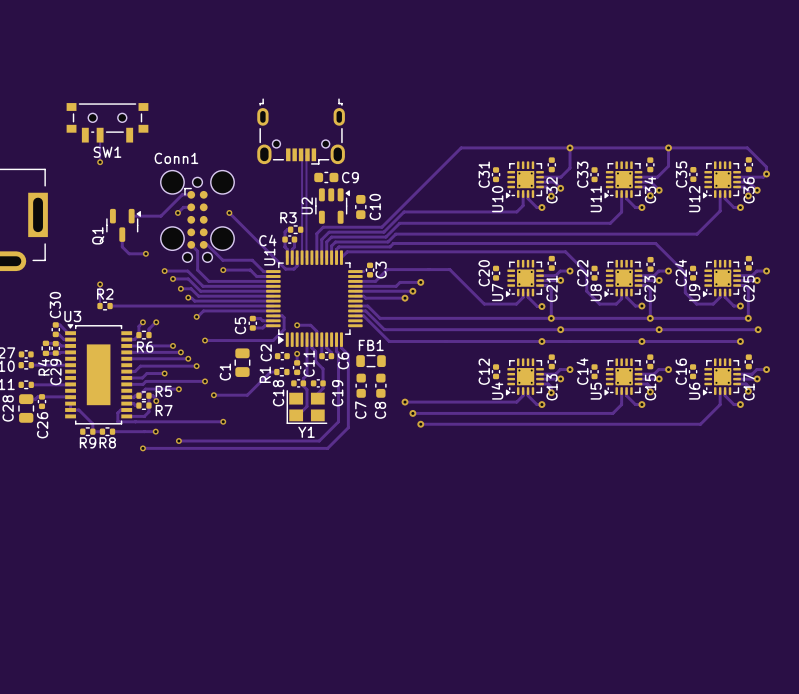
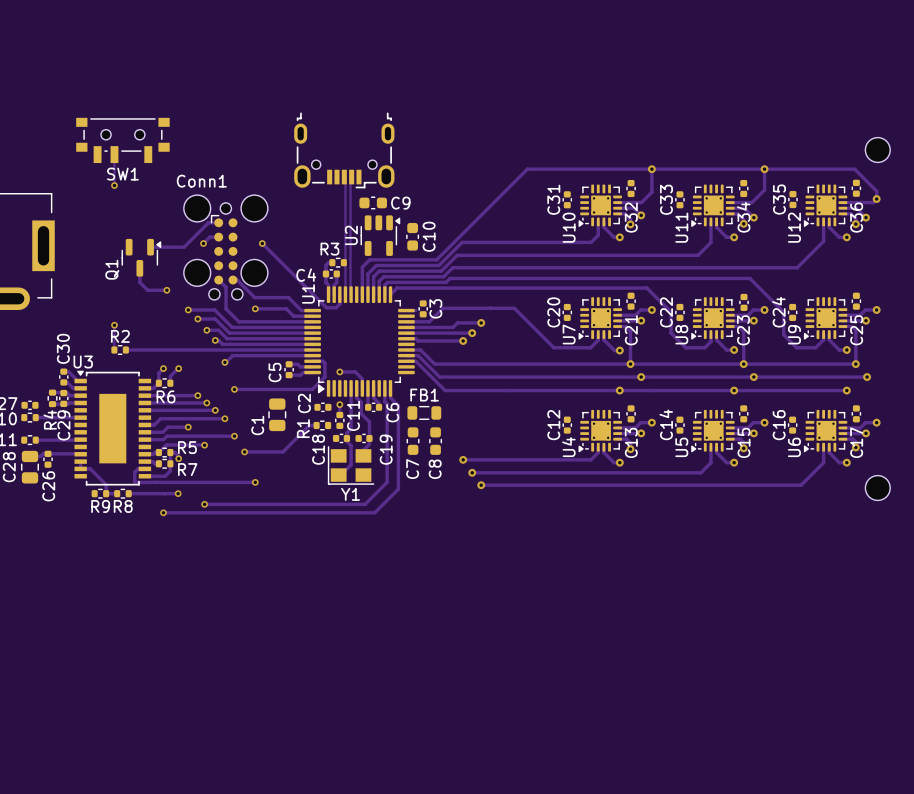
part: none -> (877, 150)
part: none -> (877, 488)

